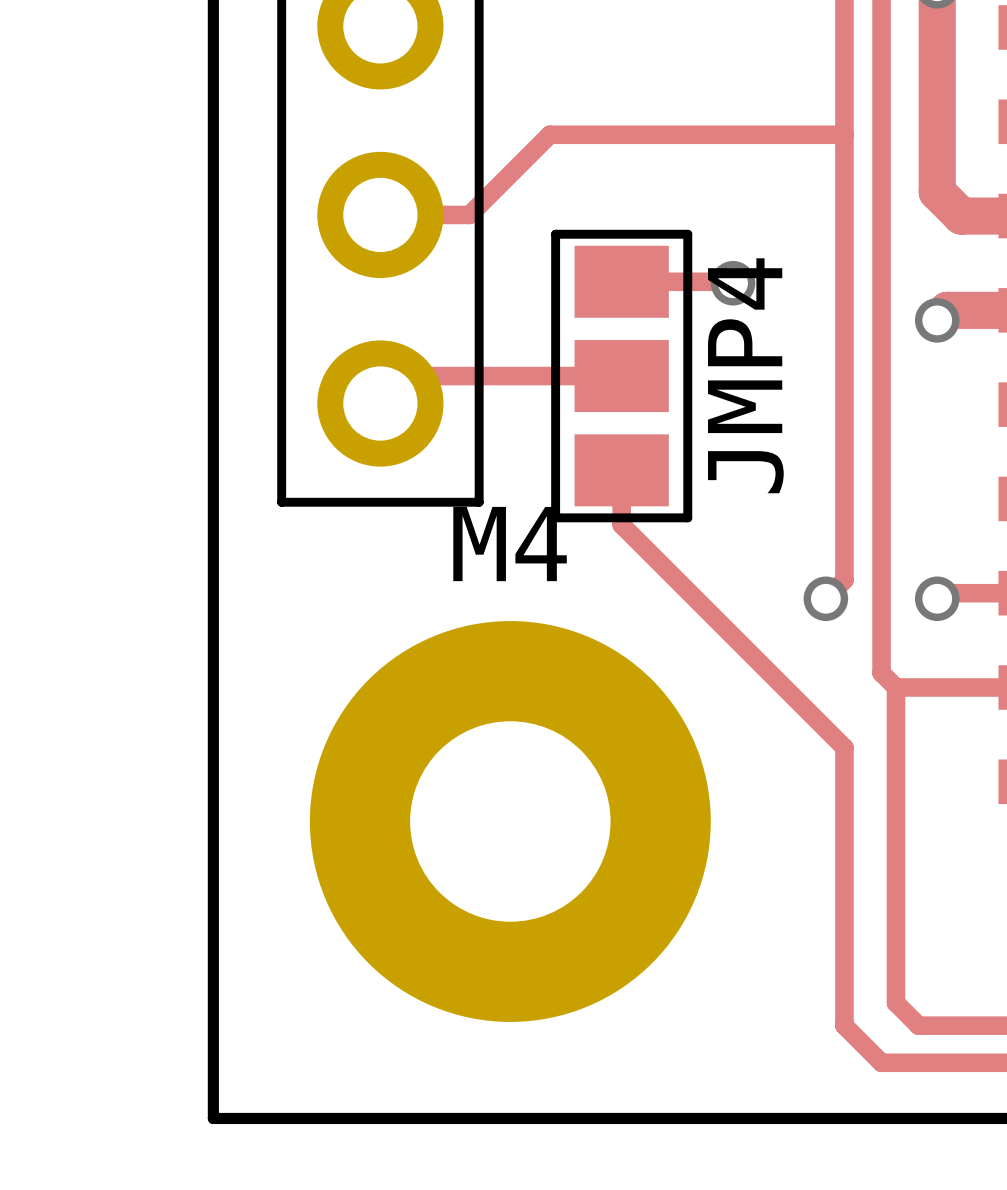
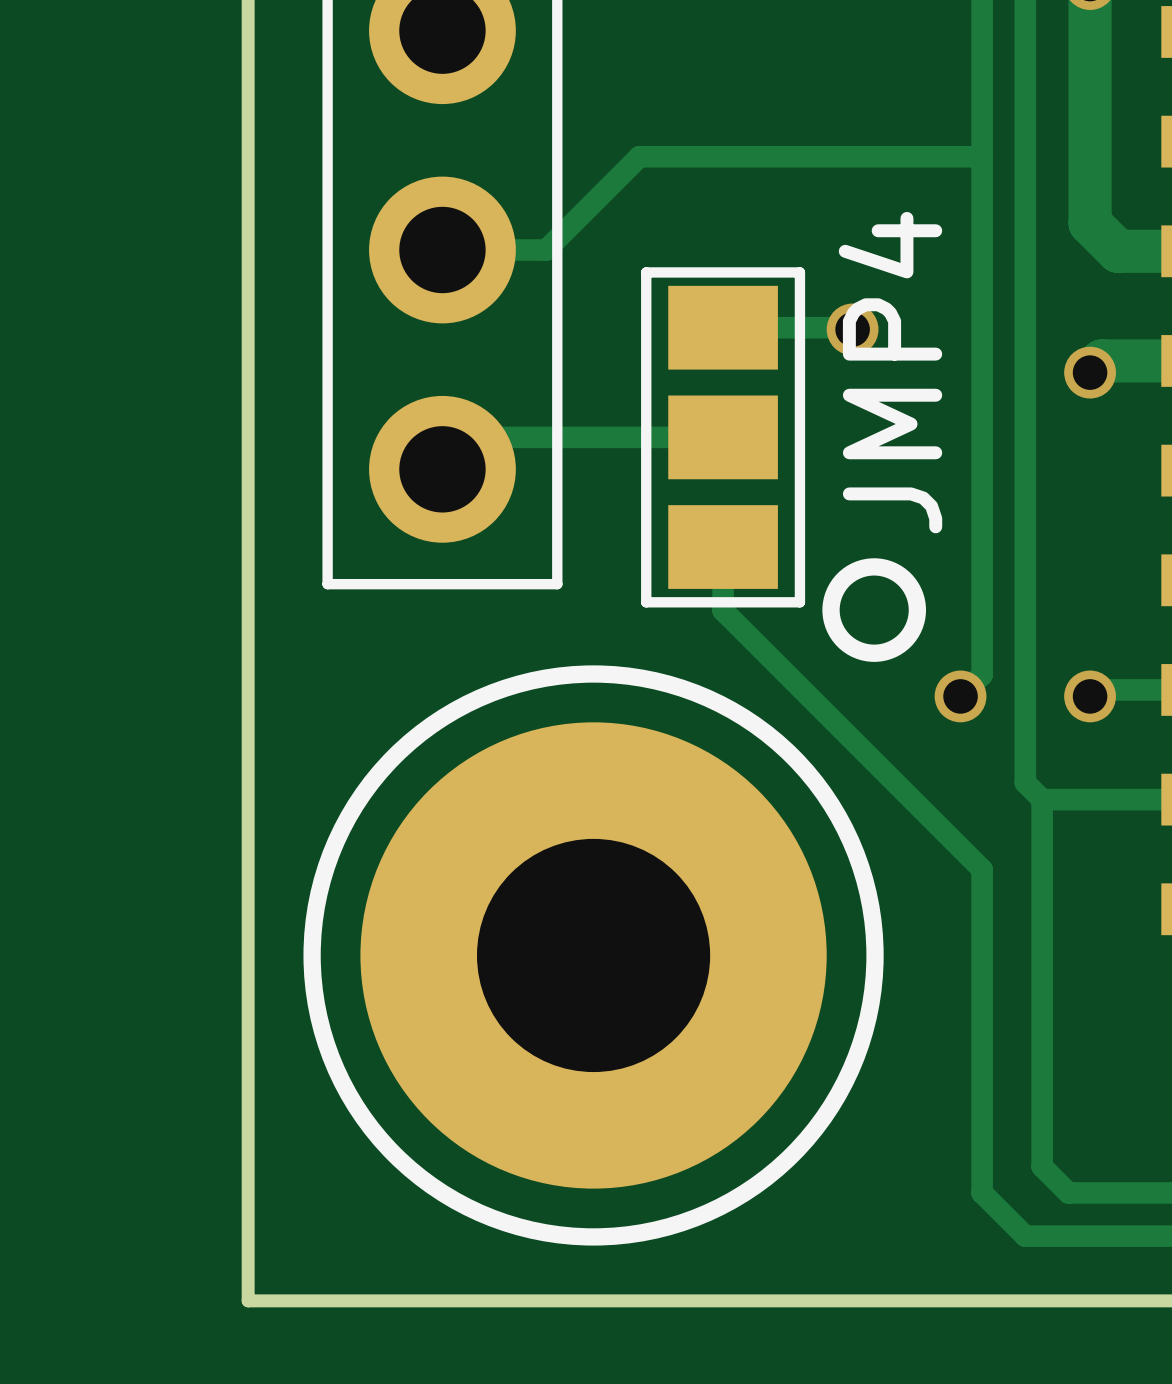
JMP4 name position: JMP4 (745, 375) -> JMP4 (890, 372)
drawing: none -> [303, 558, 927, 1246]
M4 name: M4 (510, 544) -> none

